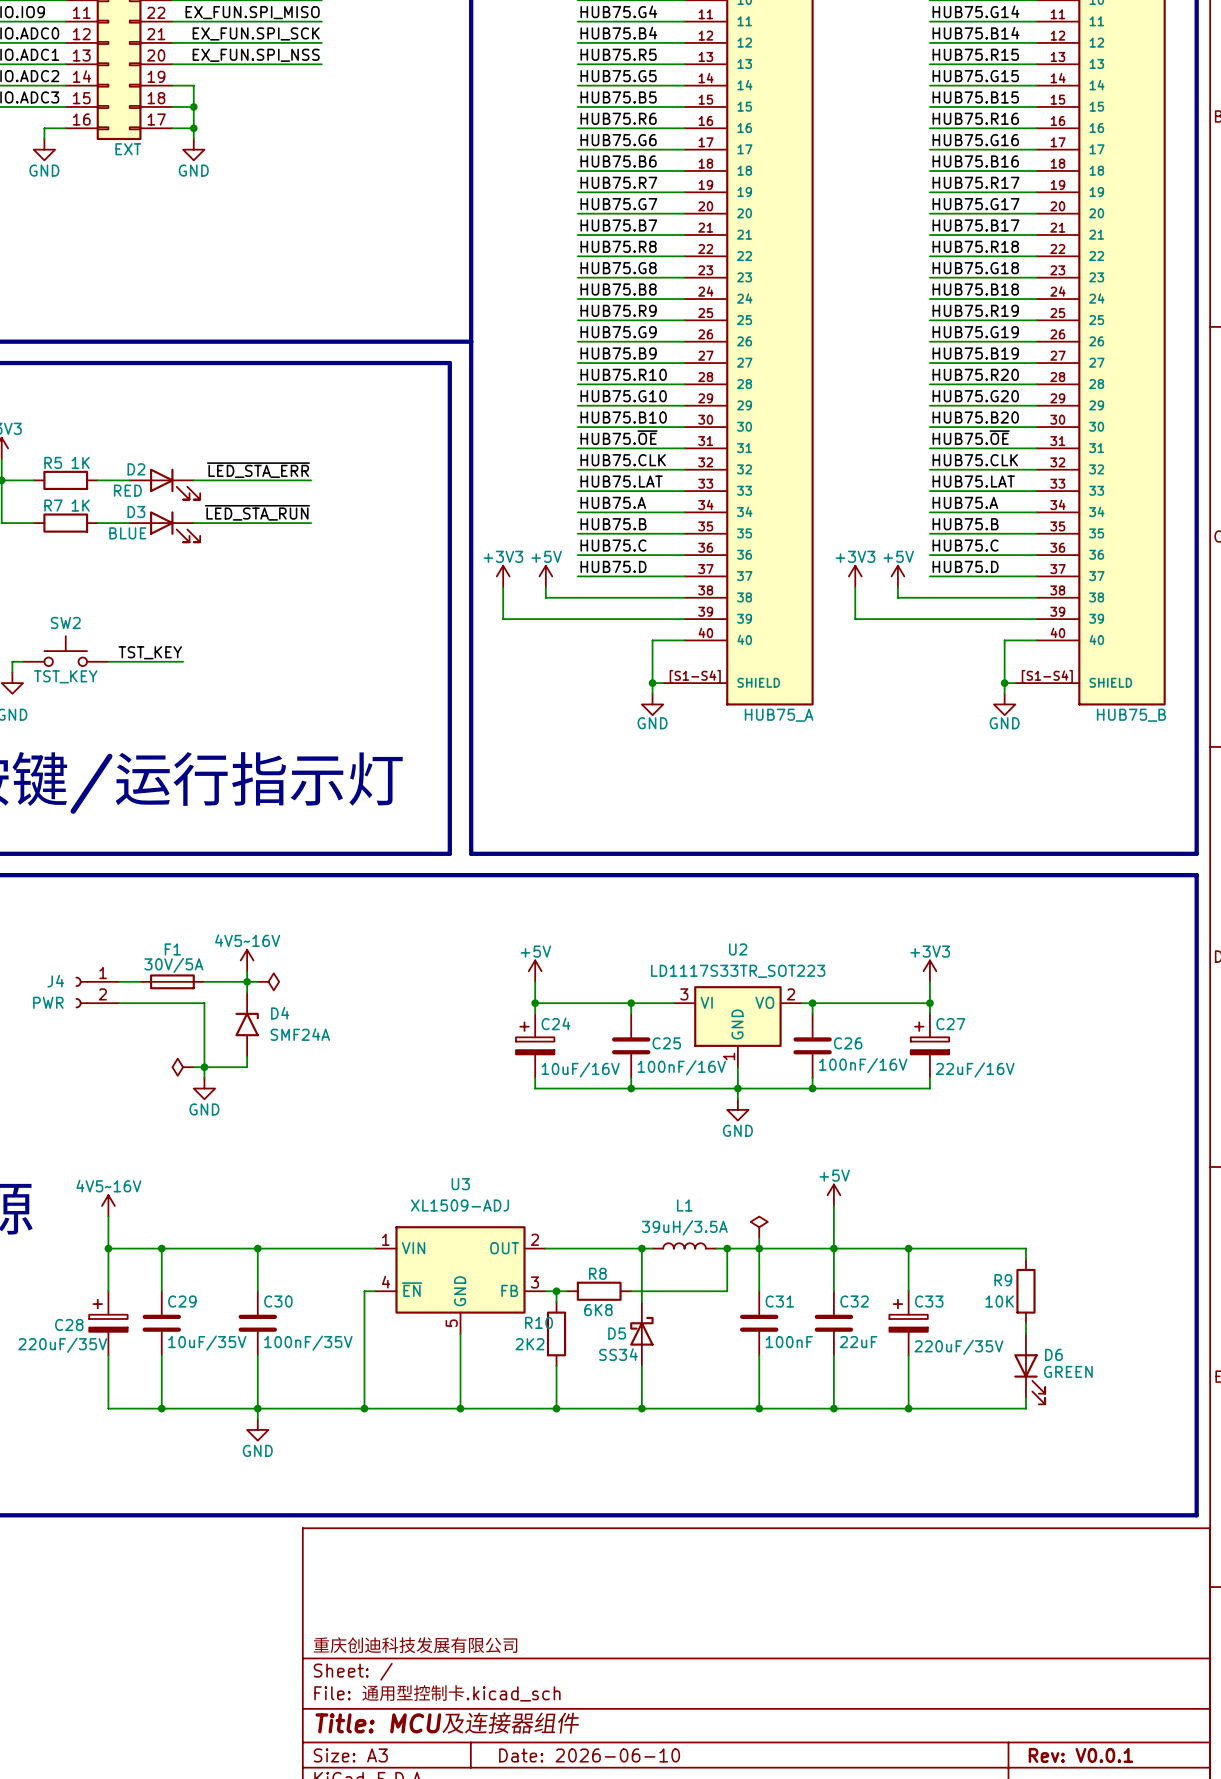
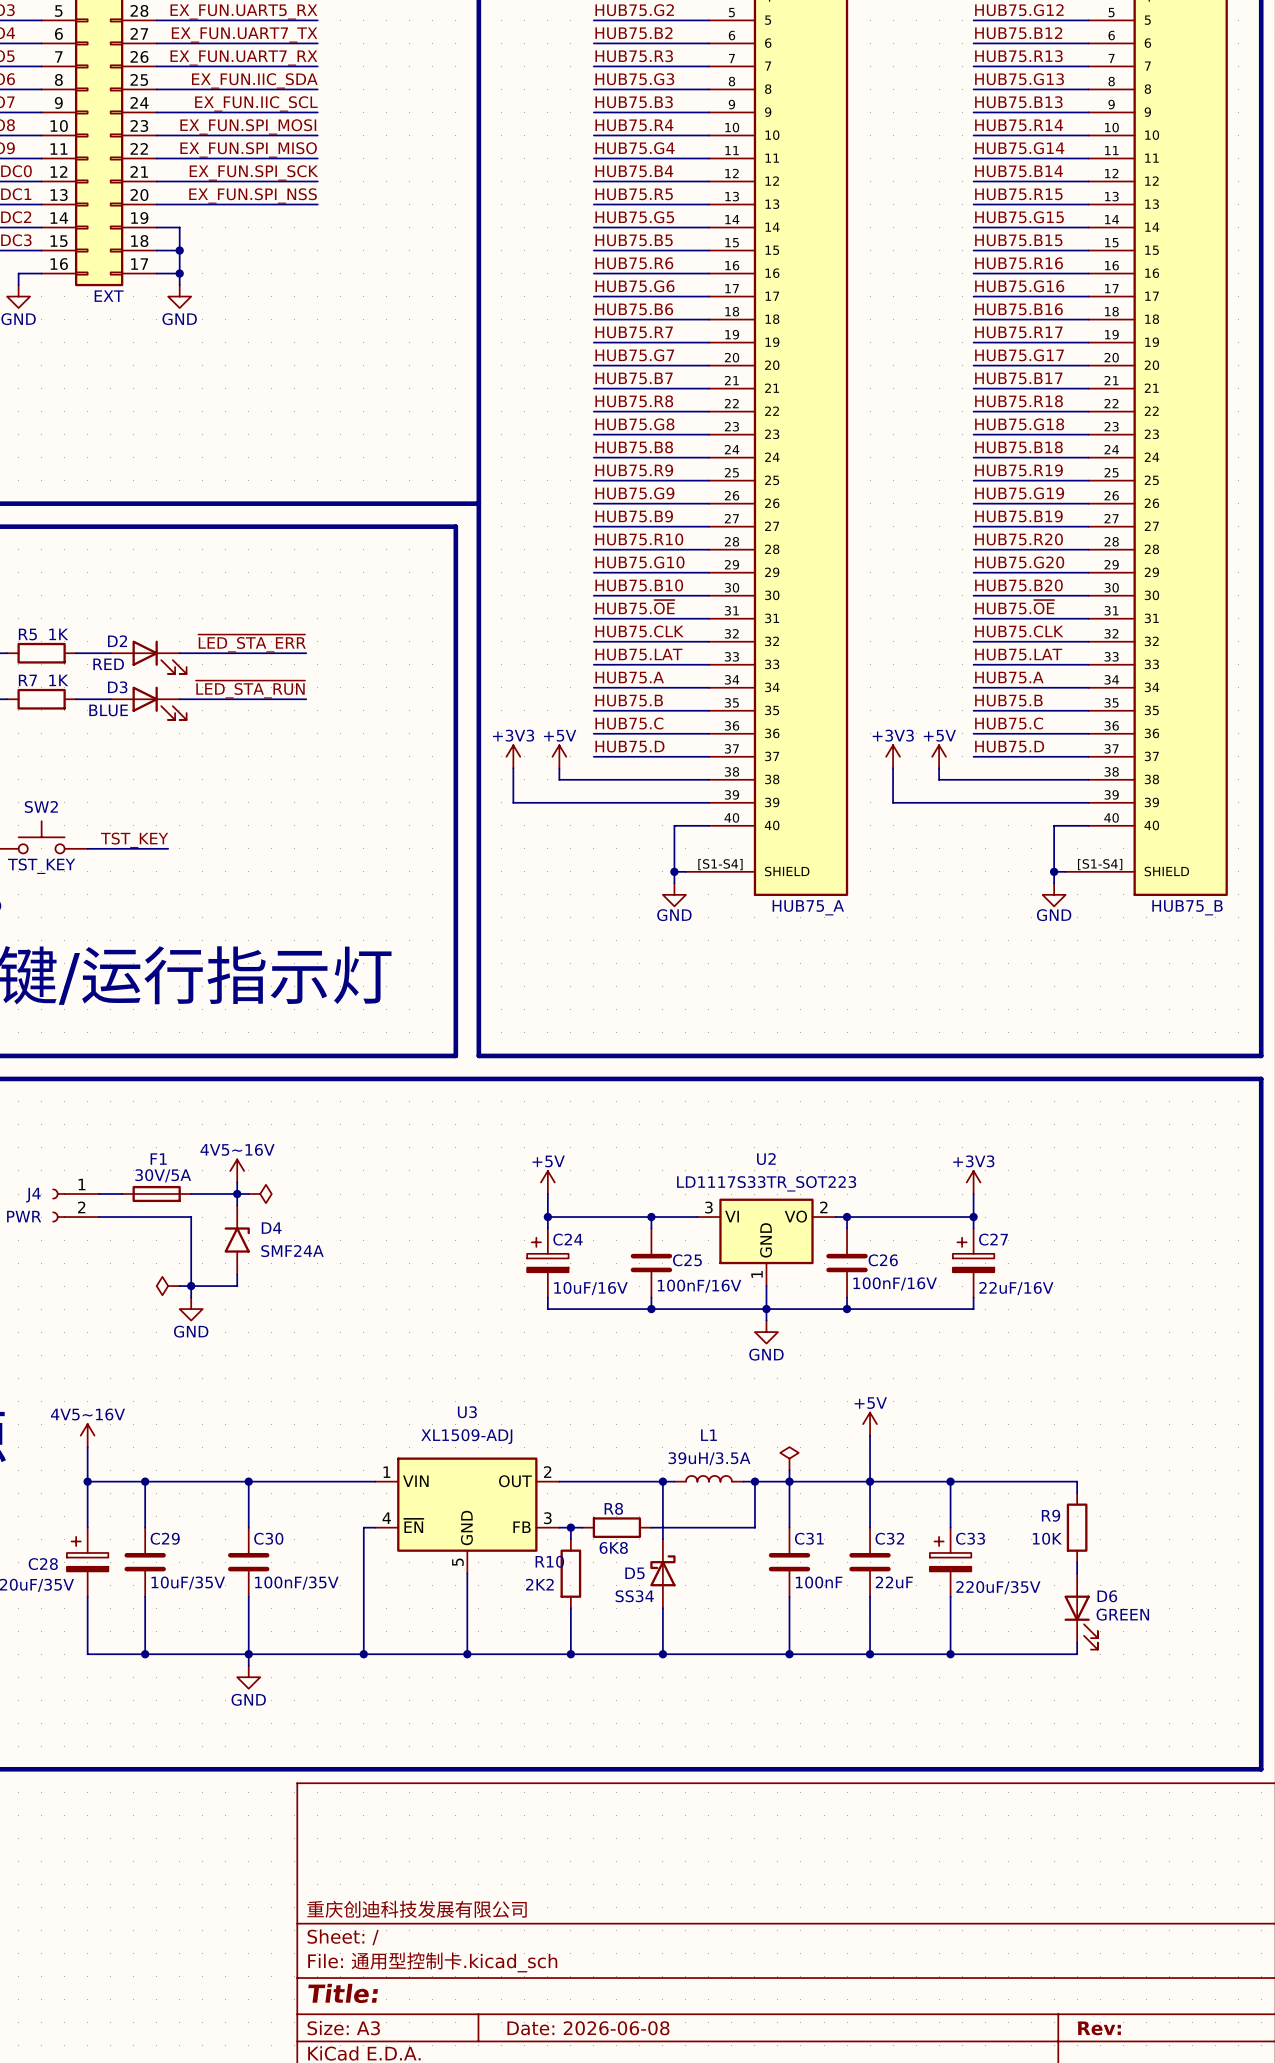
title block: Title: MCU及连接器组件 (448, 1723) -> Title: (343, 1993)
title block: Date: 2026-06-10 (589, 1755) -> Date: 2026-06-08 (588, 2028)
title block: Rev: V0.0.1 (1080, 1755) -> Rev: (1099, 2028)

